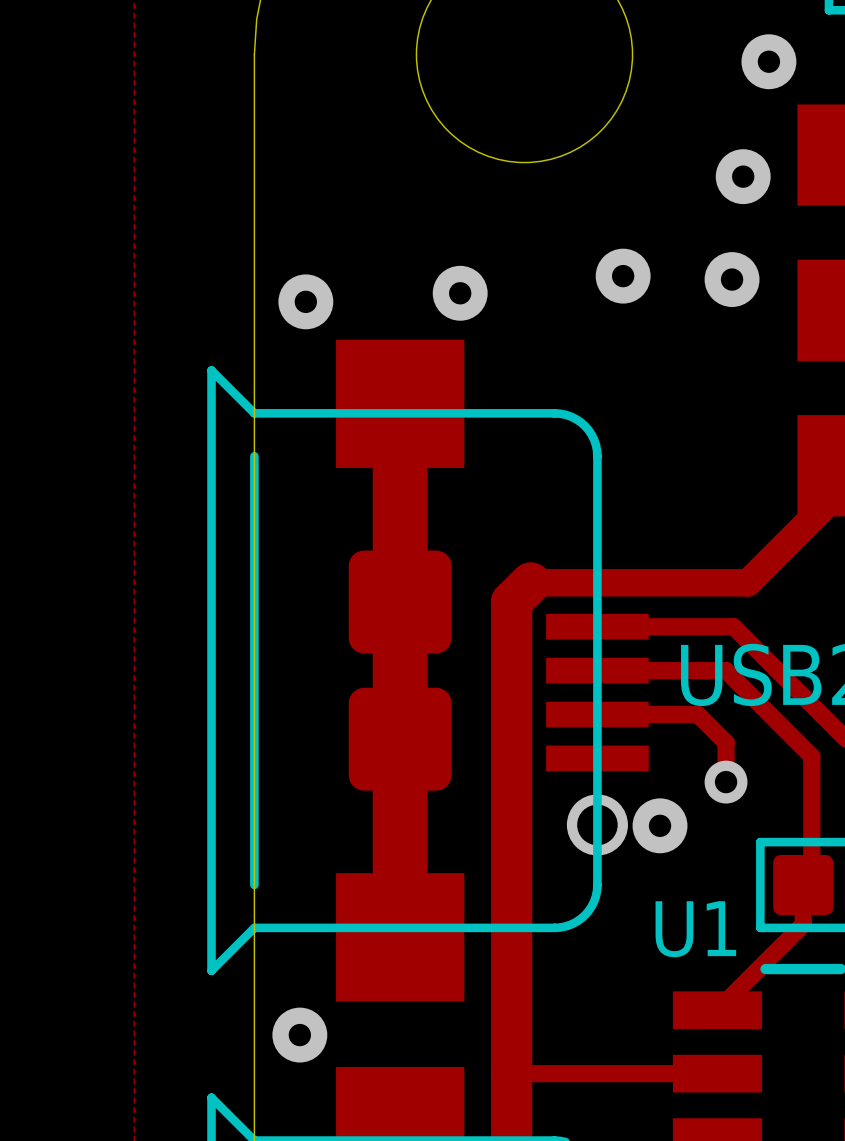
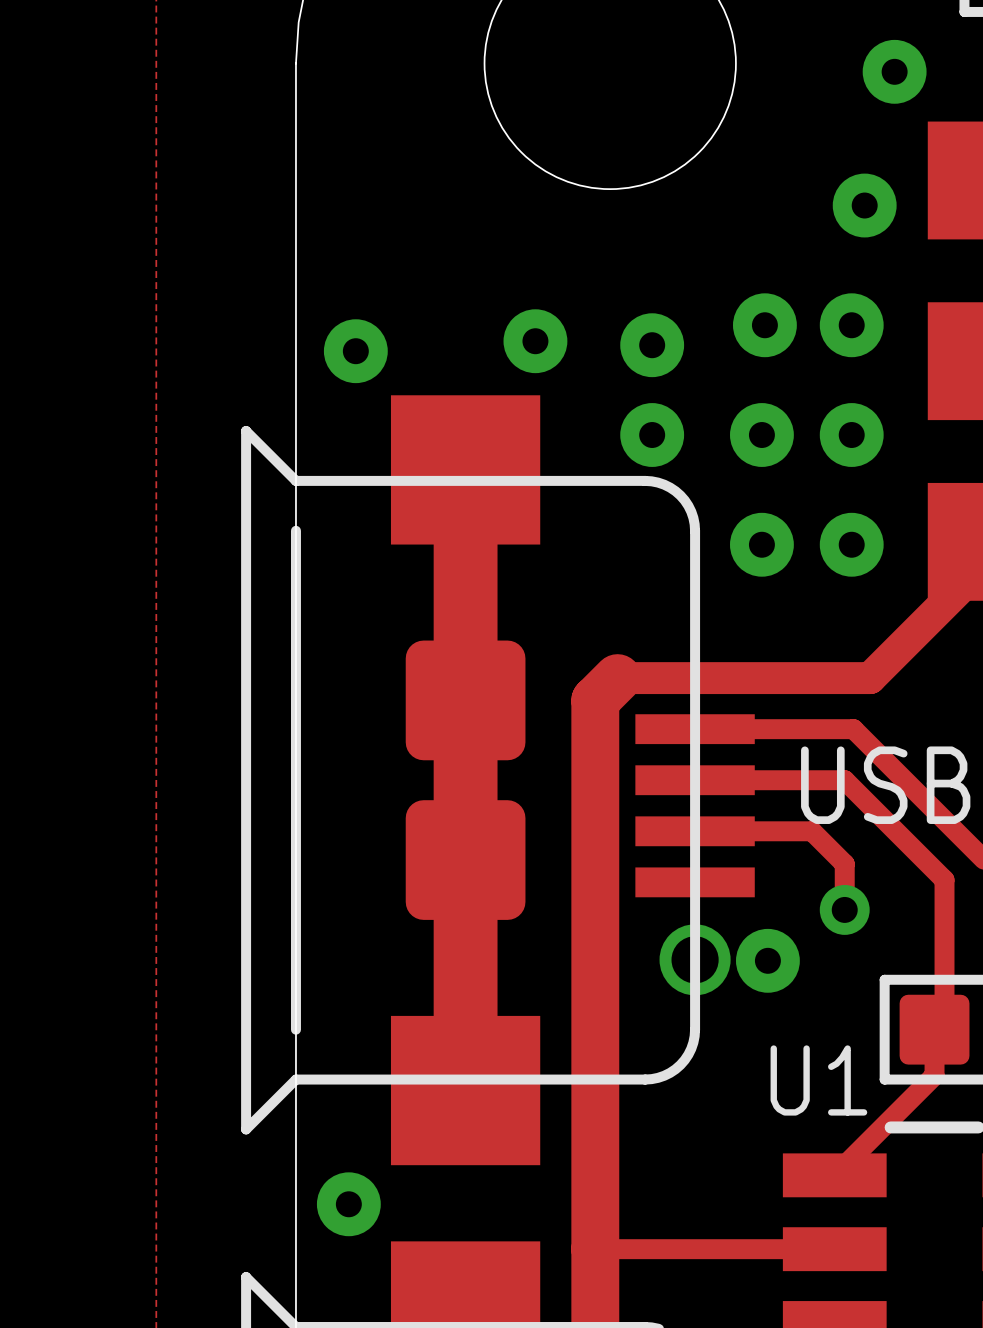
via position: (623, 276) -> (764, 325)
via: none -> (652, 345)
via: none -> (652, 435)
via: none -> (761, 435)
via: none -> (851, 435)
via: none -> (761, 544)
via: none -> (851, 544)

